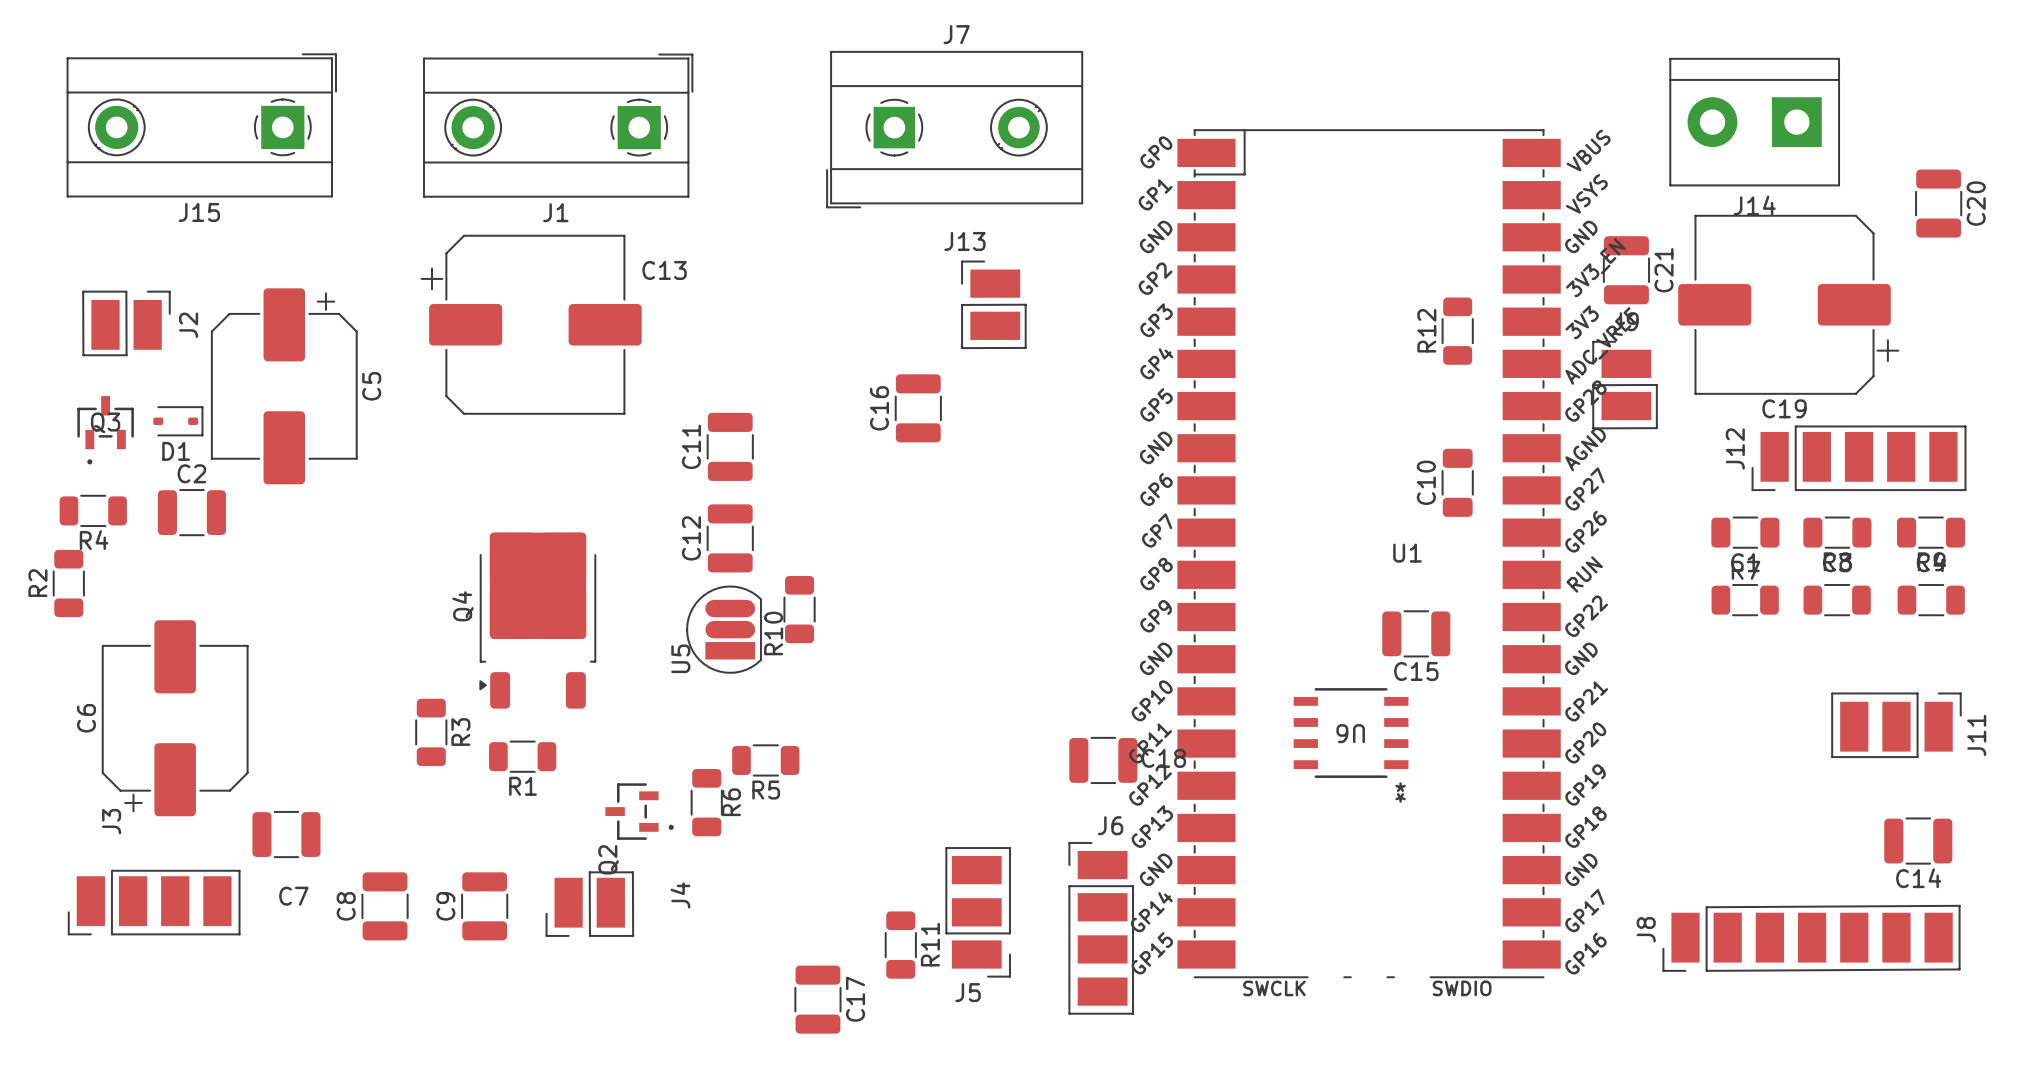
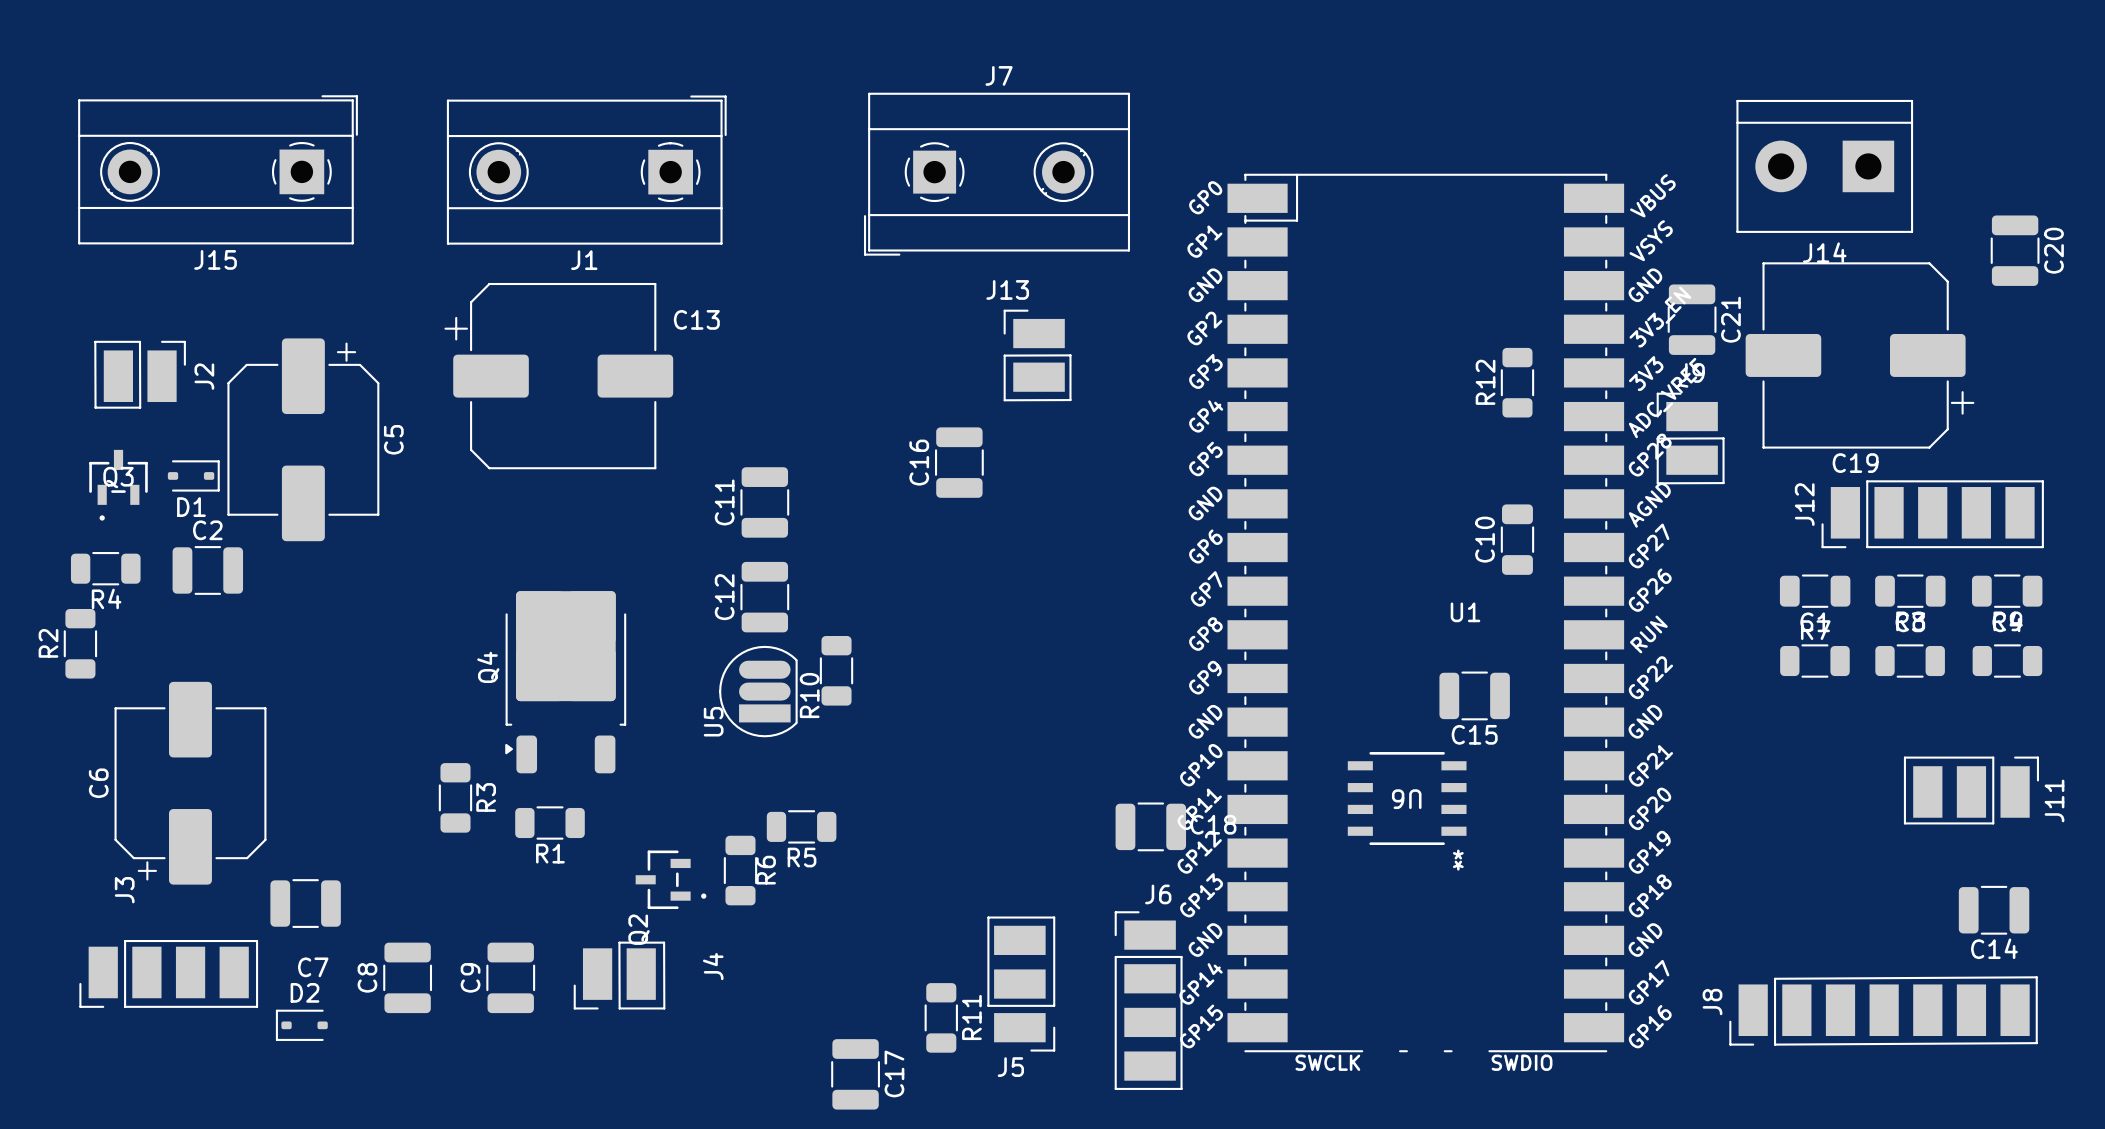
D2: none -> (301, 1025)

